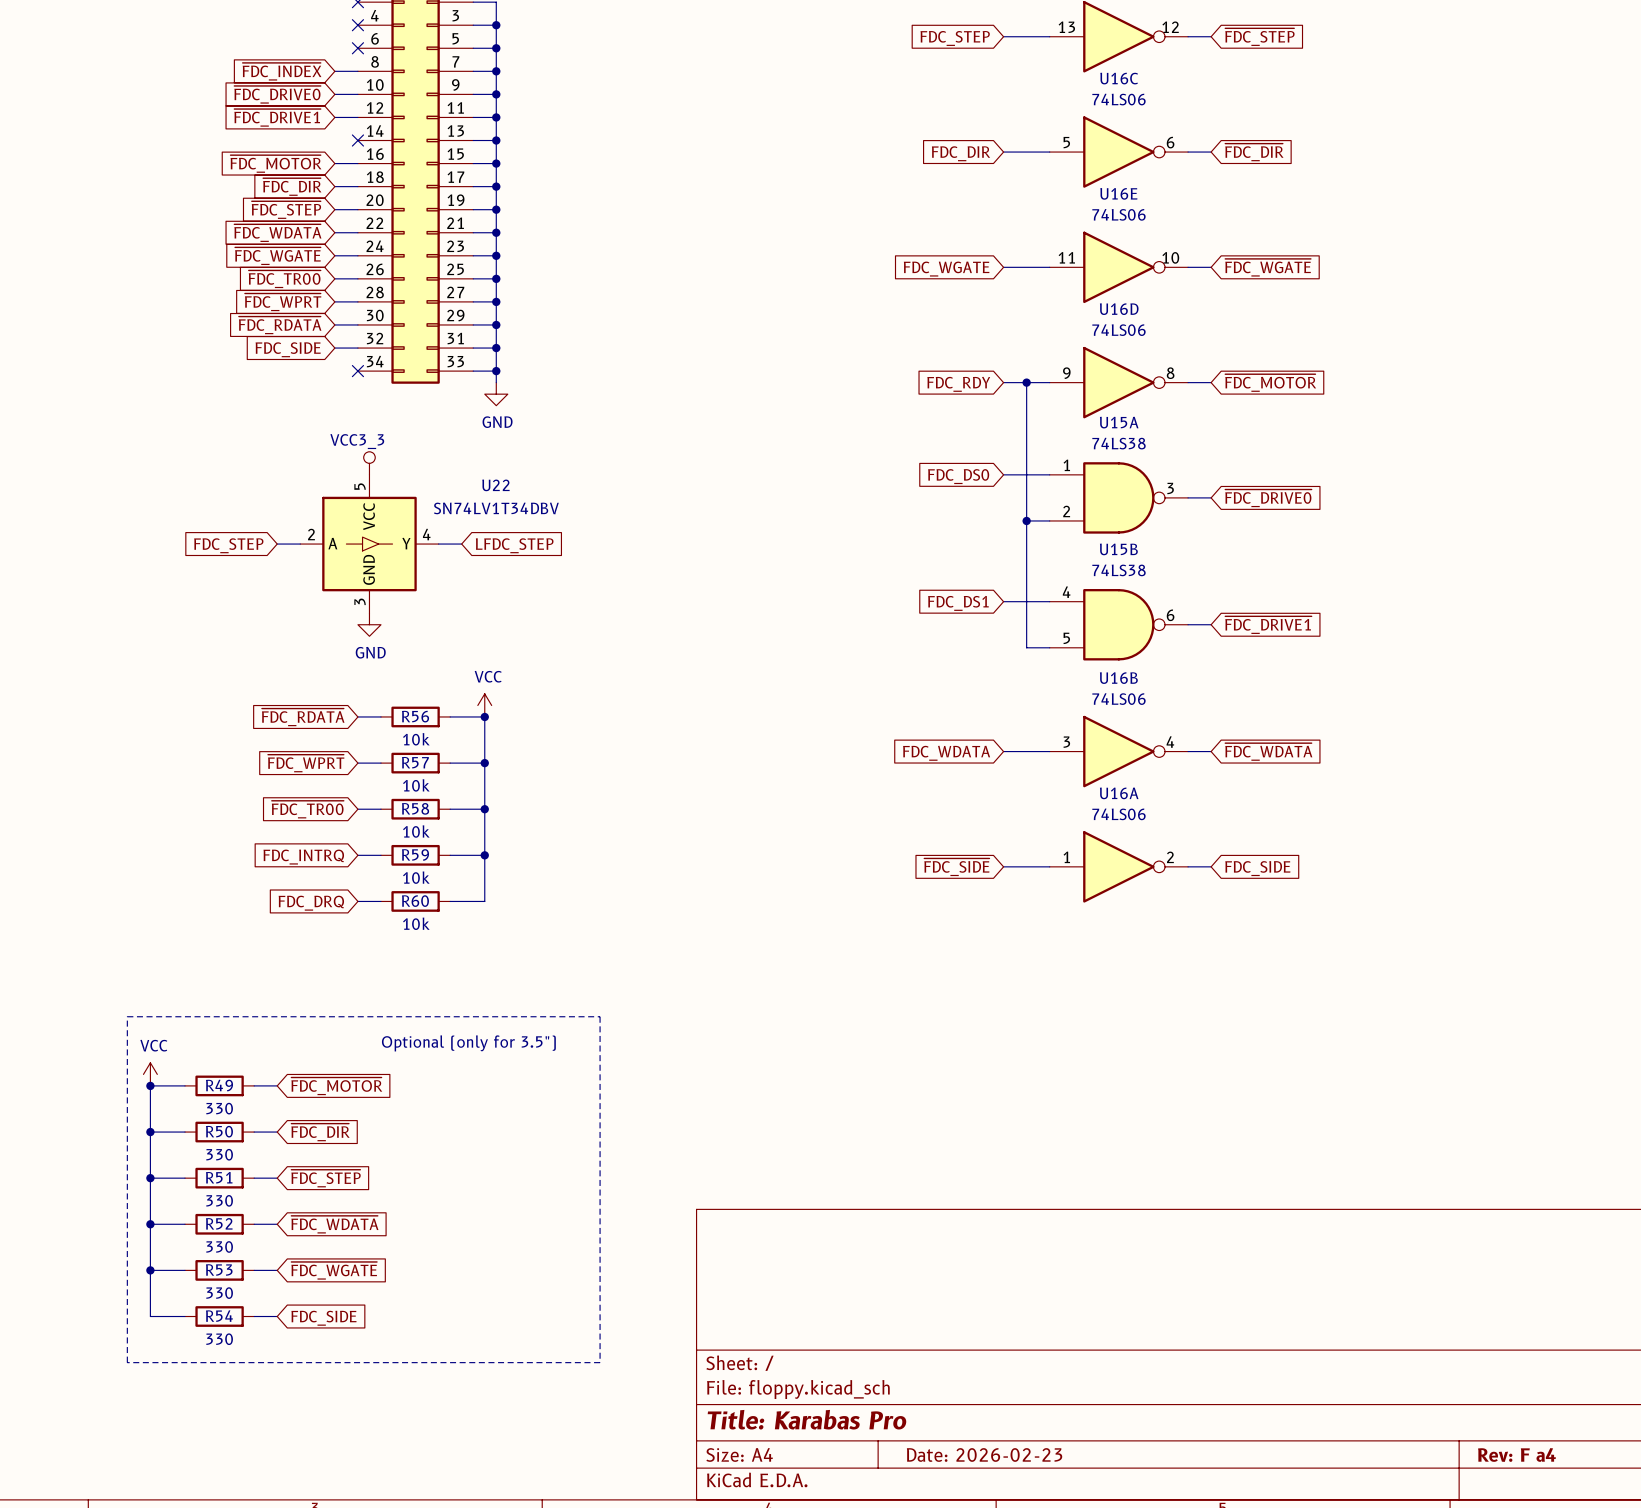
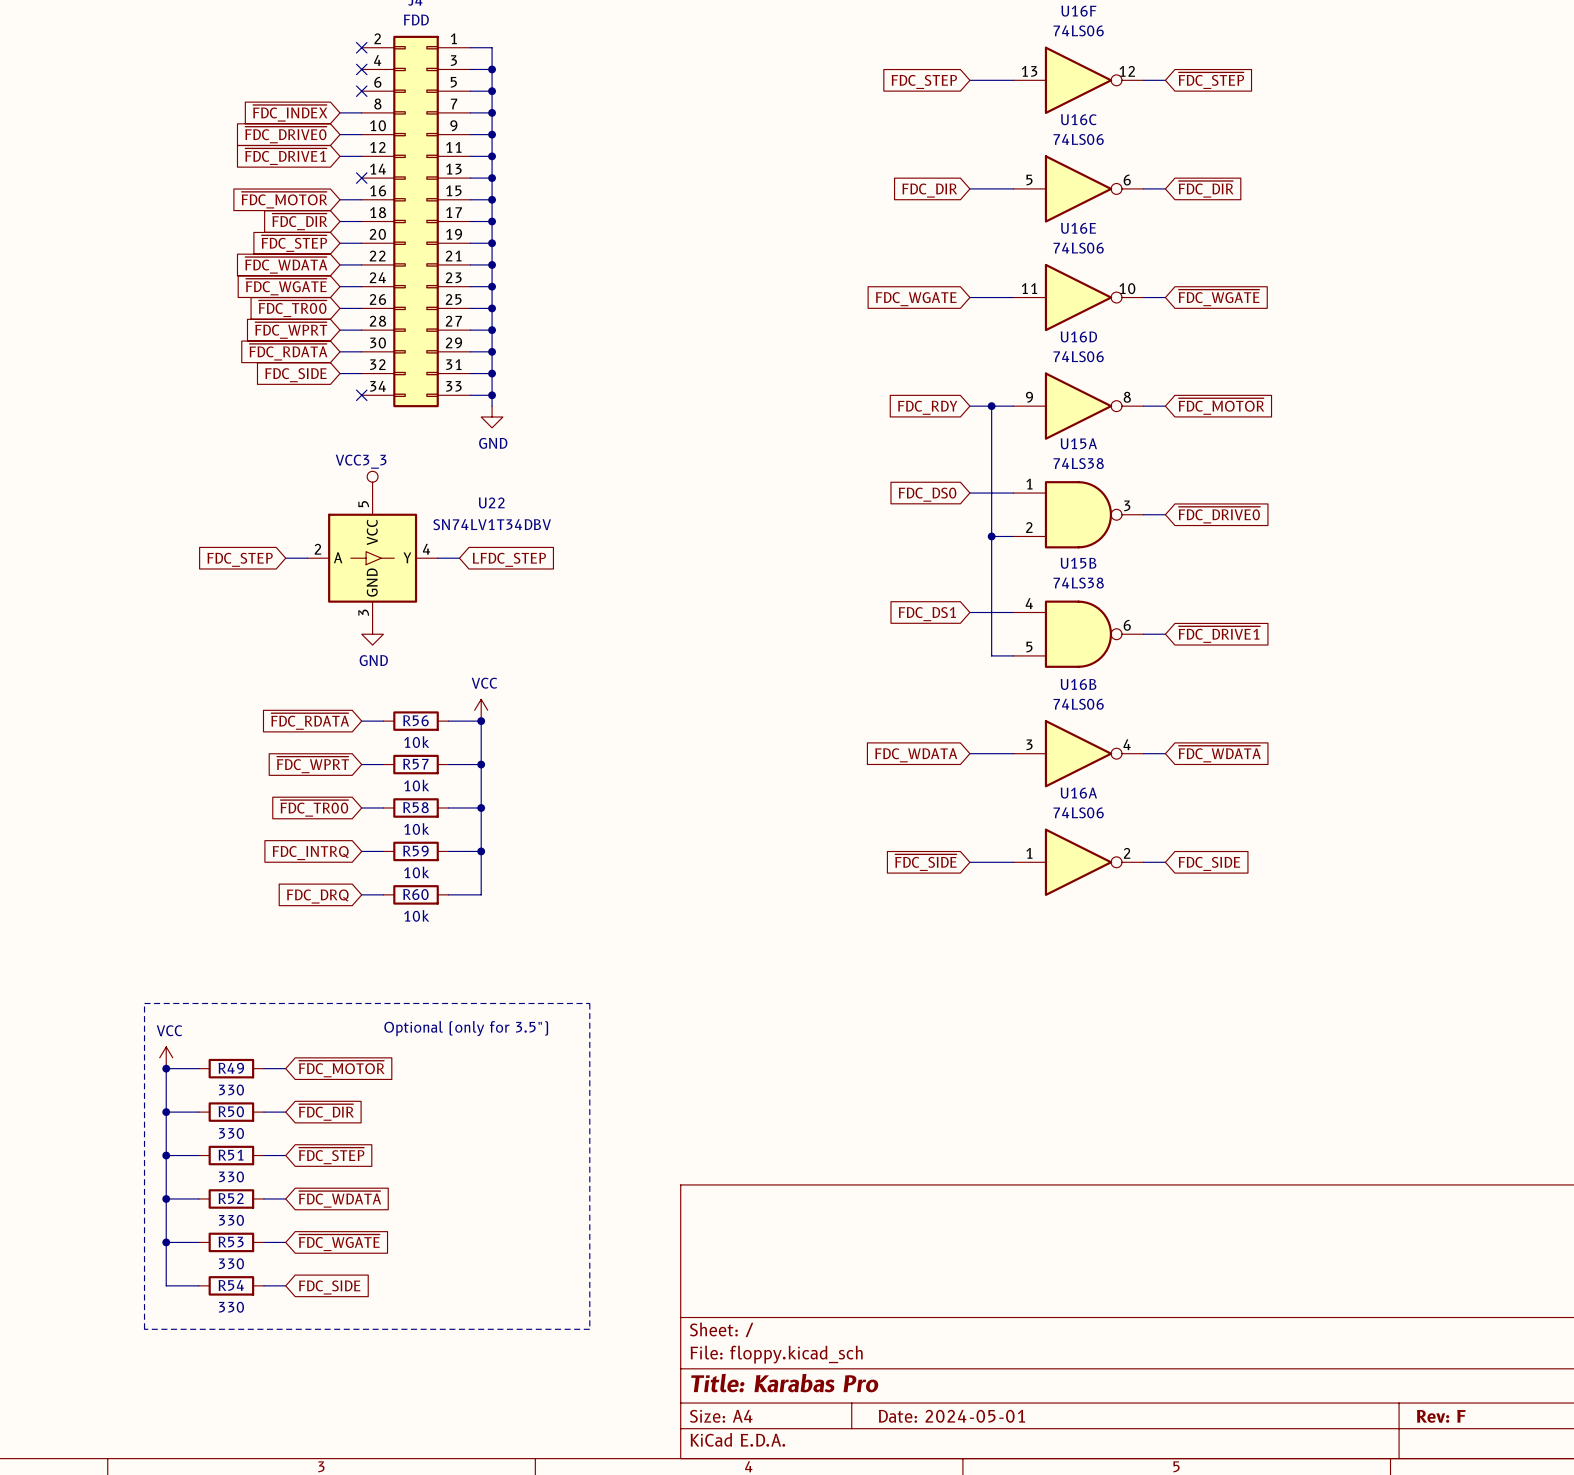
title block: Date: 2026-02-23 (984, 1454) -> Date: 2024-05-01 (951, 1416)
title block: Rev: F a4 (1516, 1455) -> Rev: F (1441, 1416)

